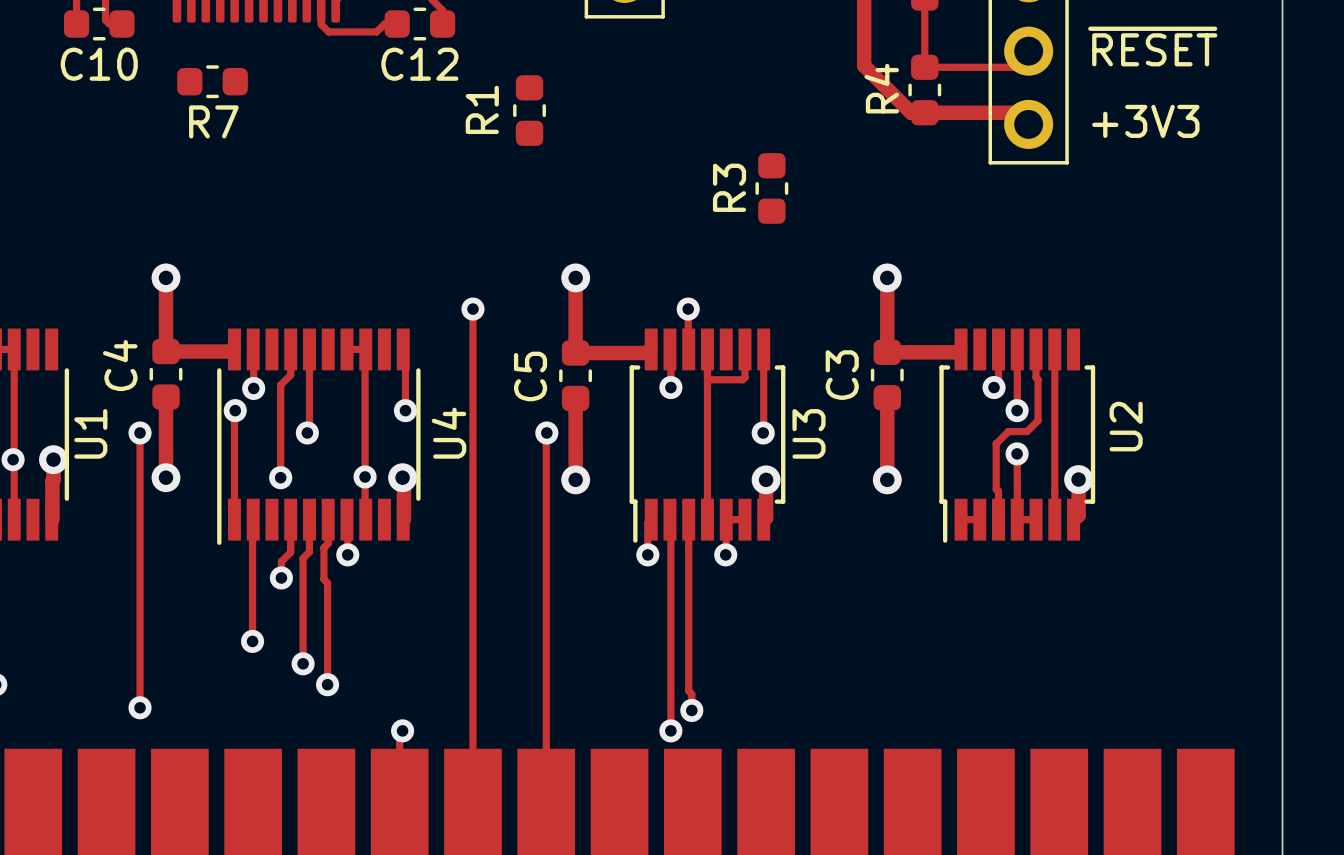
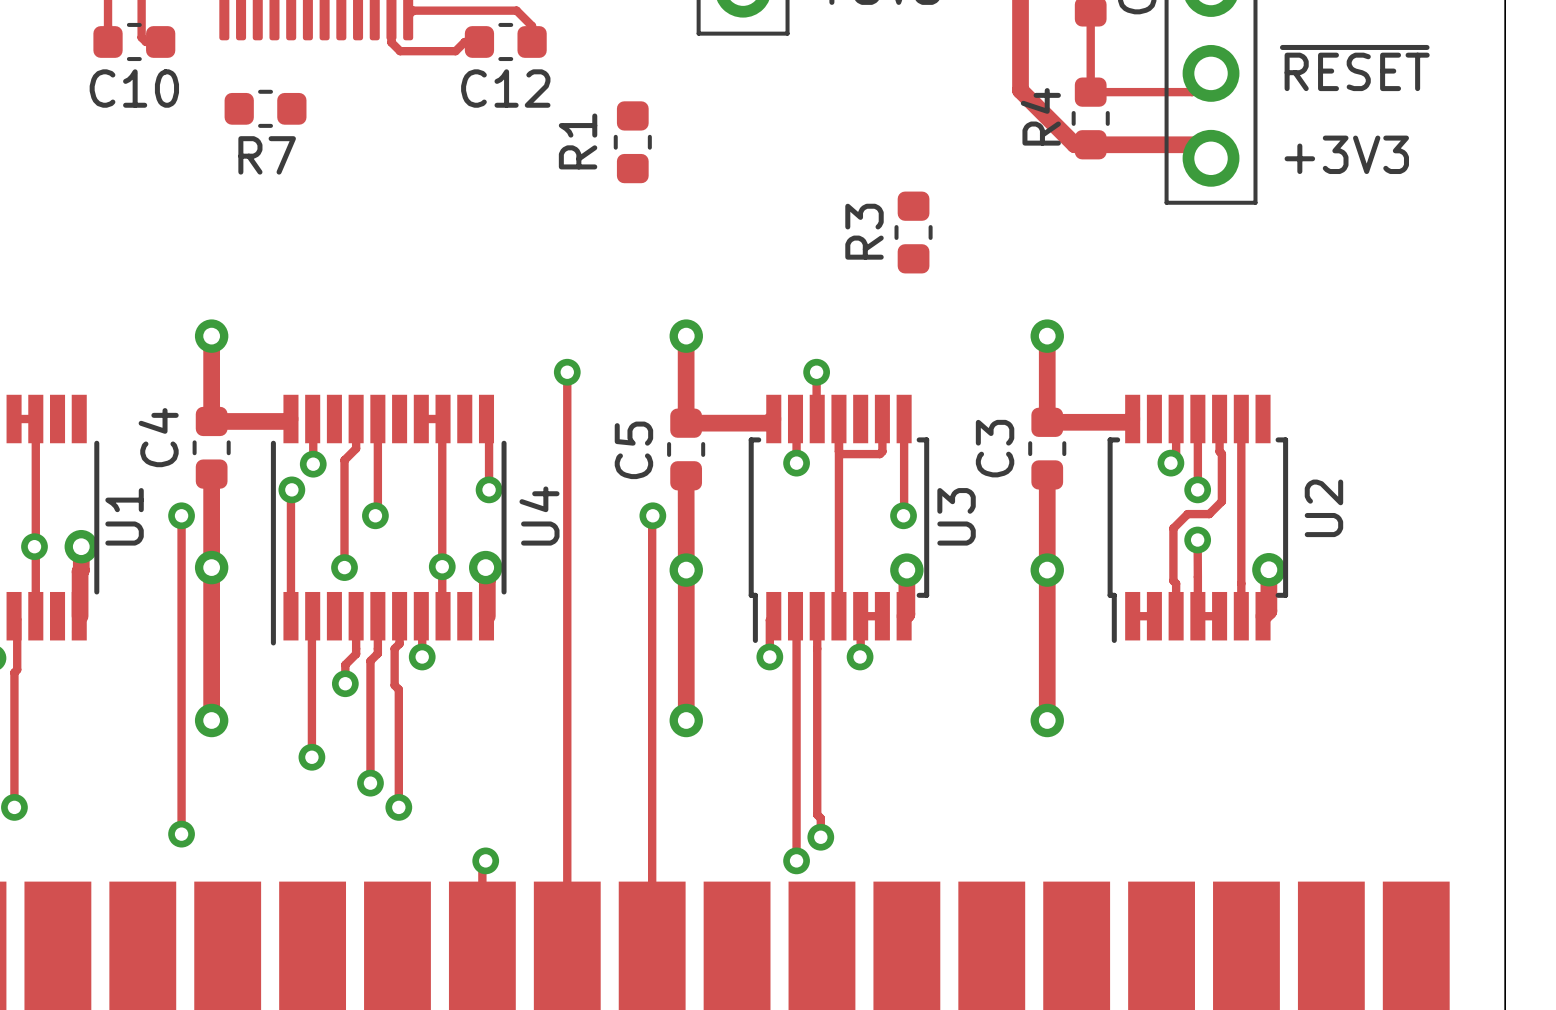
track: none -> (211, 570) (211, 720)
track: none -> (686, 570) (686, 720)
track: none -> (1047, 570) (1047, 720)
via: none -> (211, 720)
via: none -> (686, 720)
via: none -> (1047, 720)

